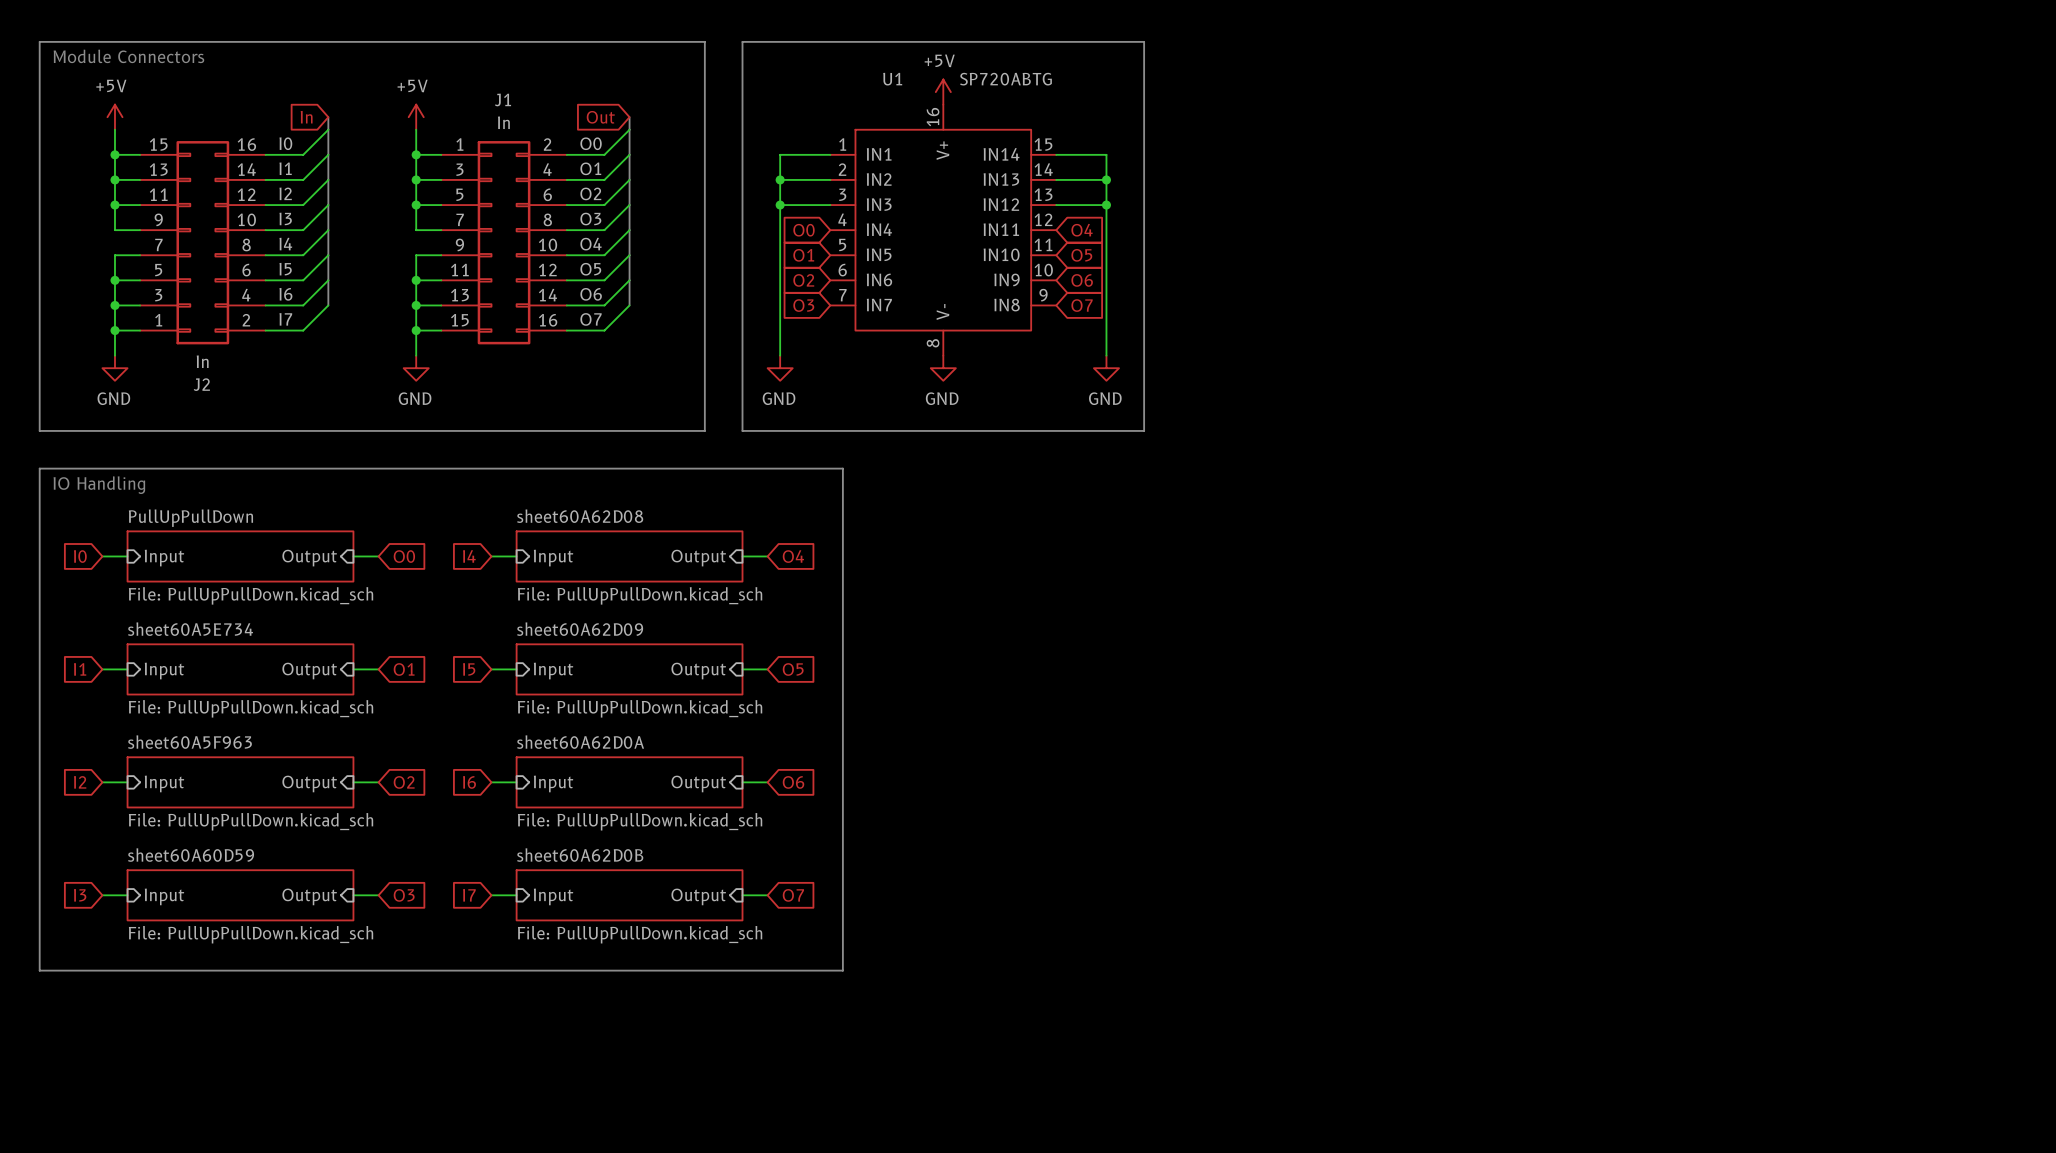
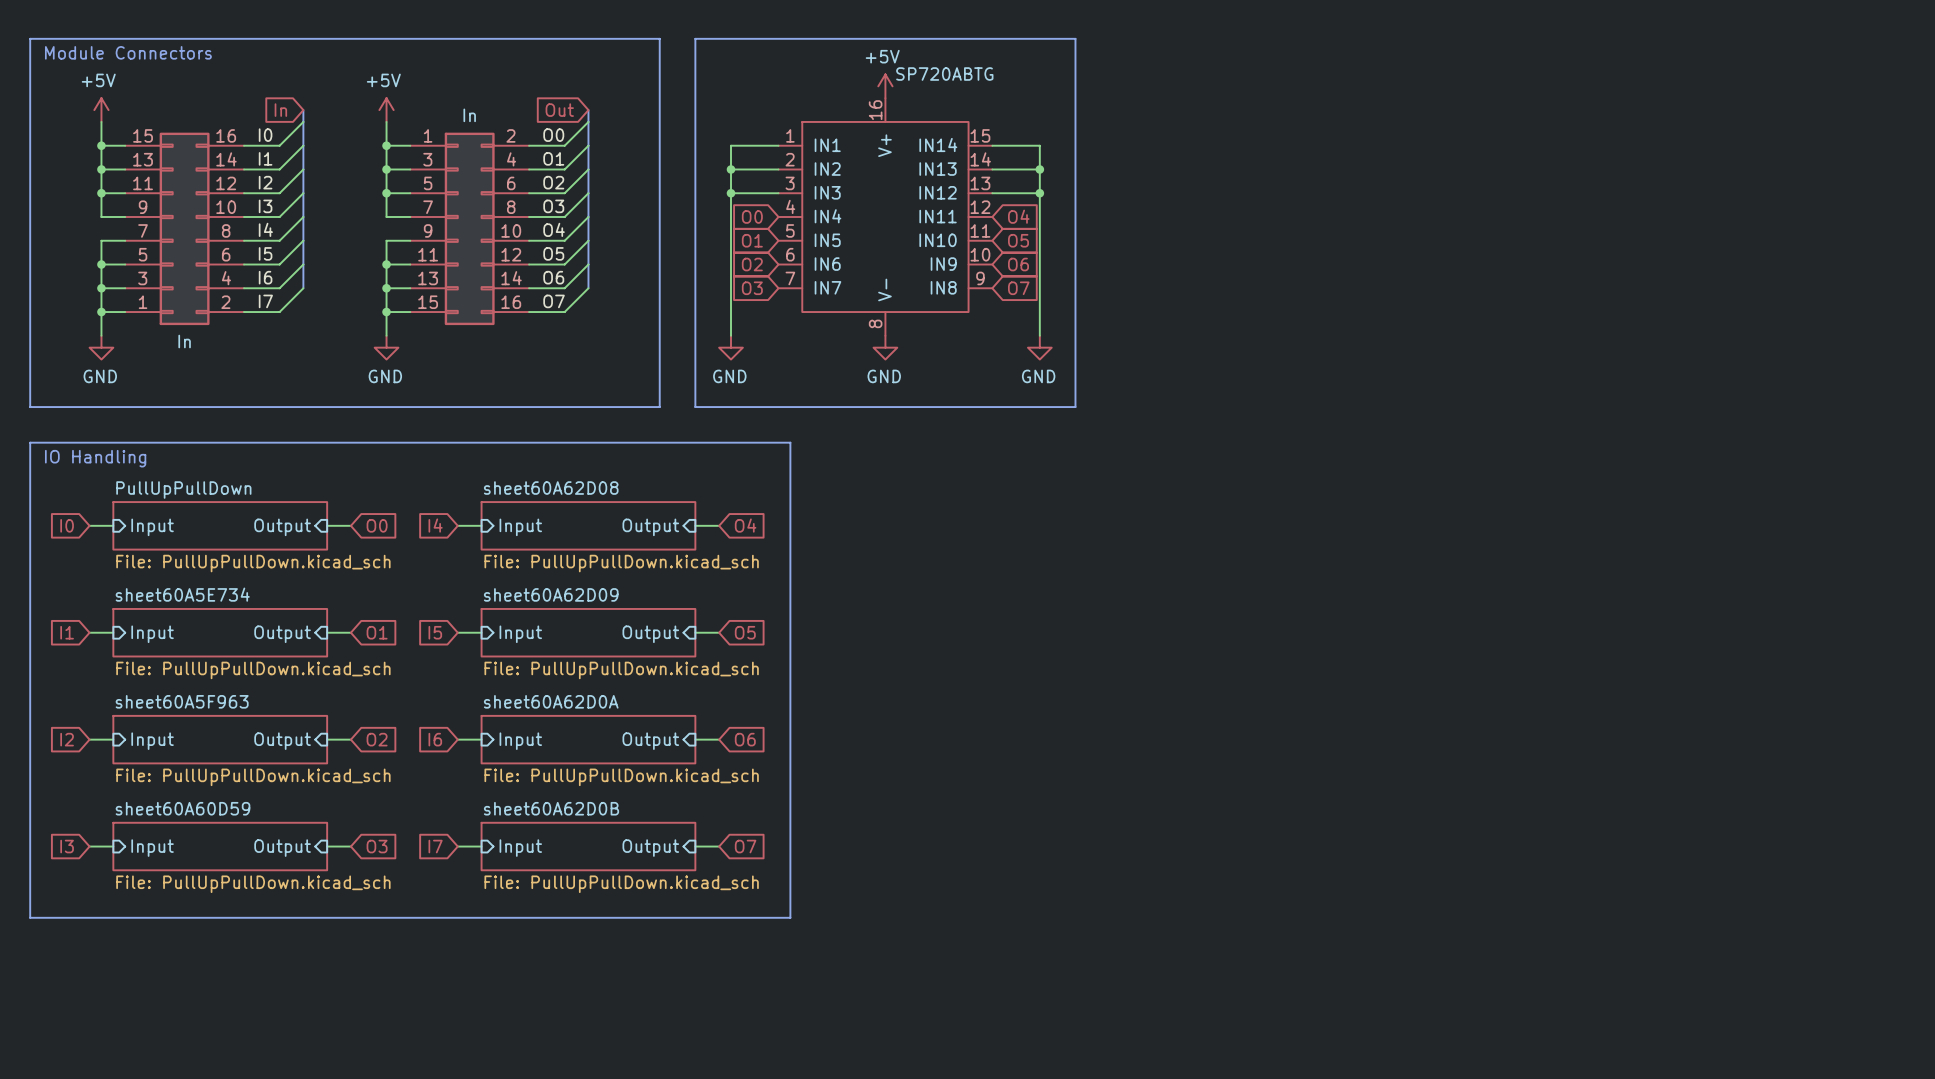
U1 name: U1 (892, 79) -> none
J1 name: J1 (503, 99) -> none
J2 name: J2 (201, 384) -> none

